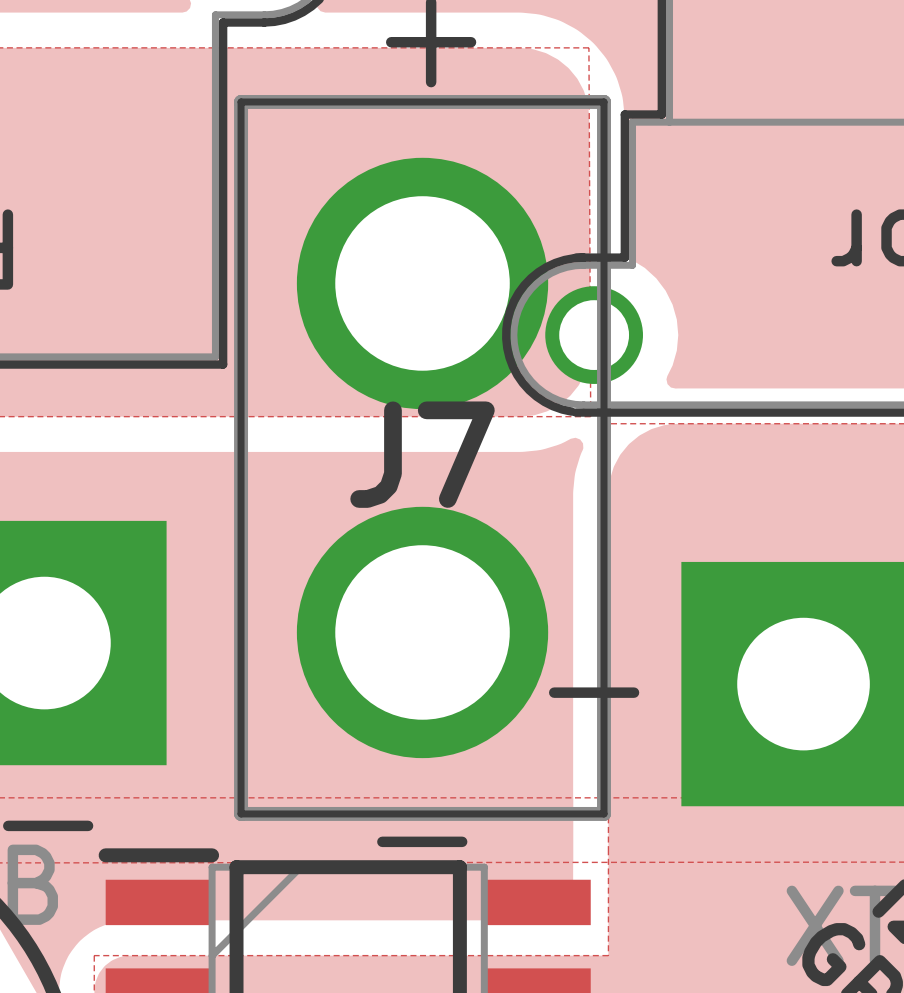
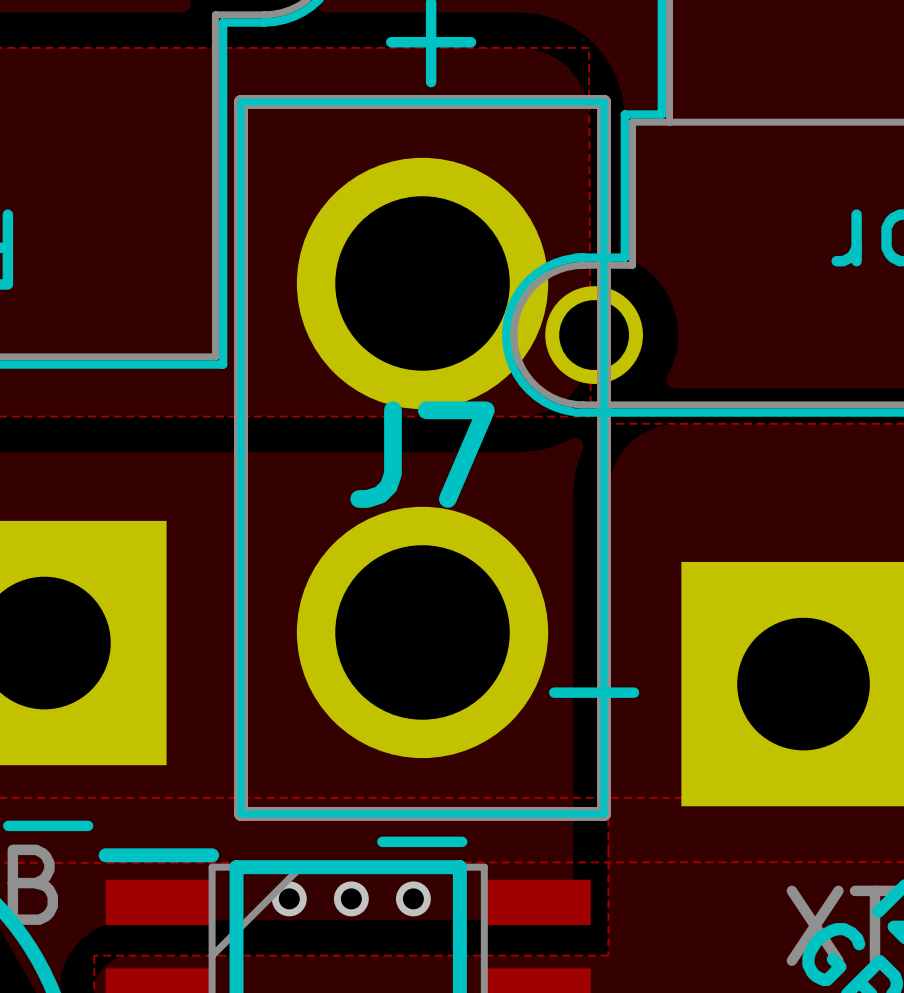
via: none -> (289, 898)
via: none -> (351, 898)
via: none -> (413, 898)

